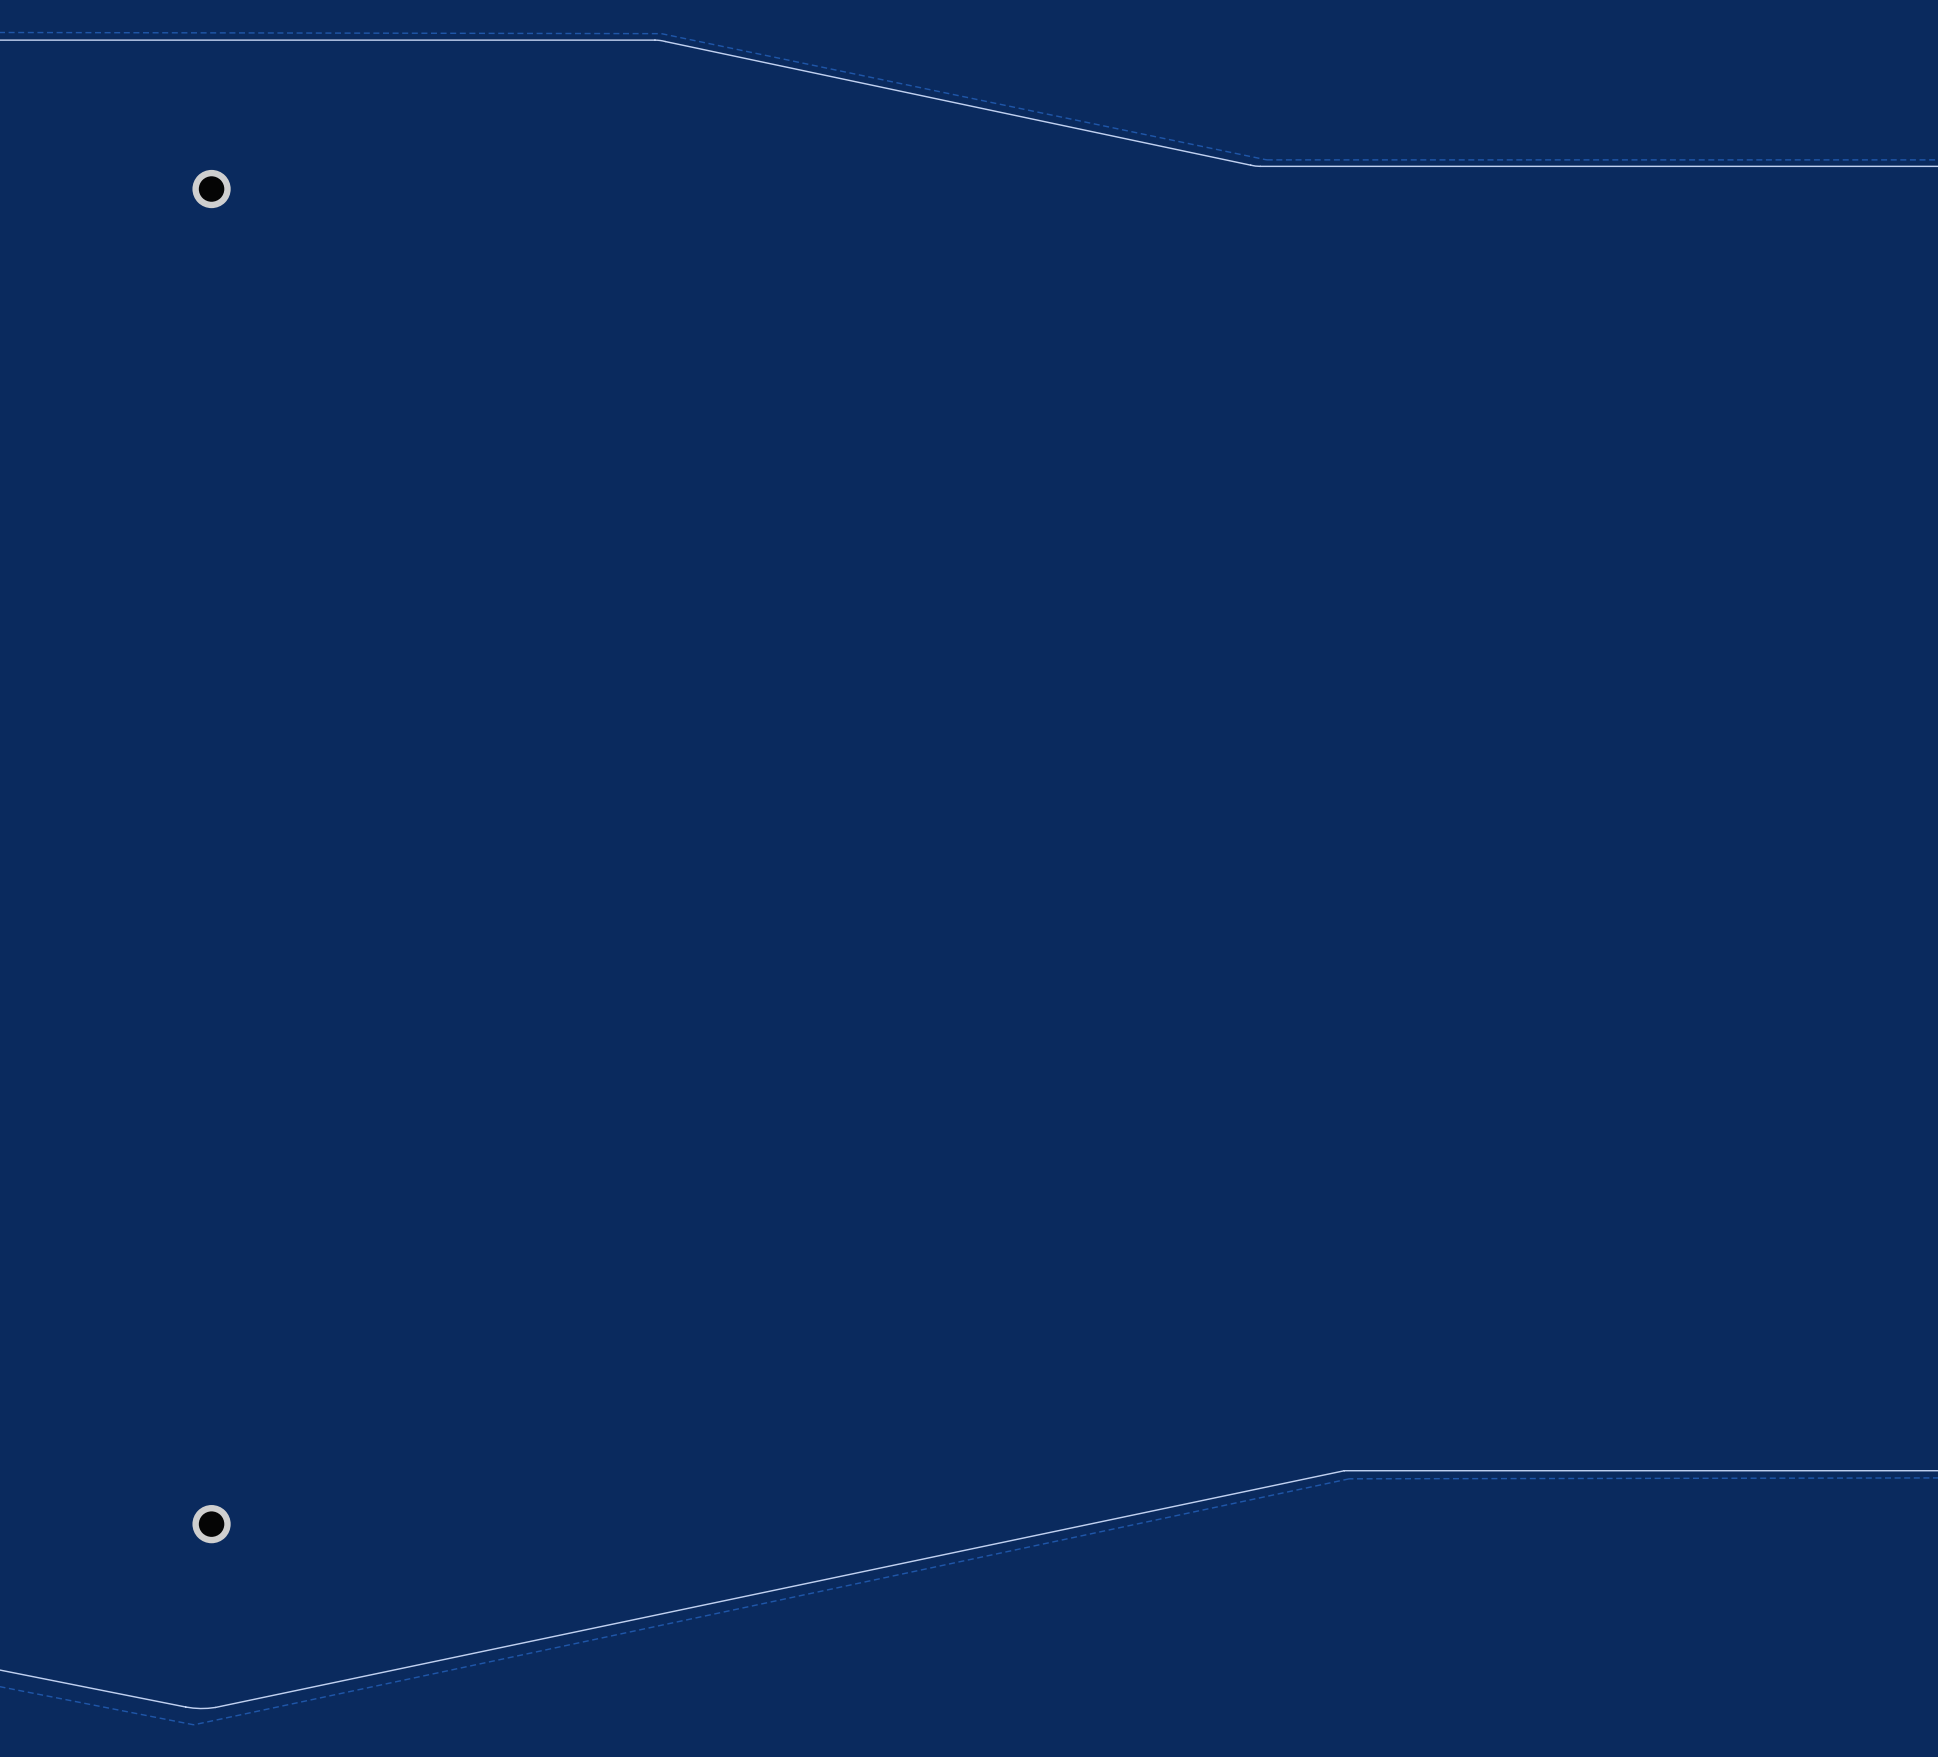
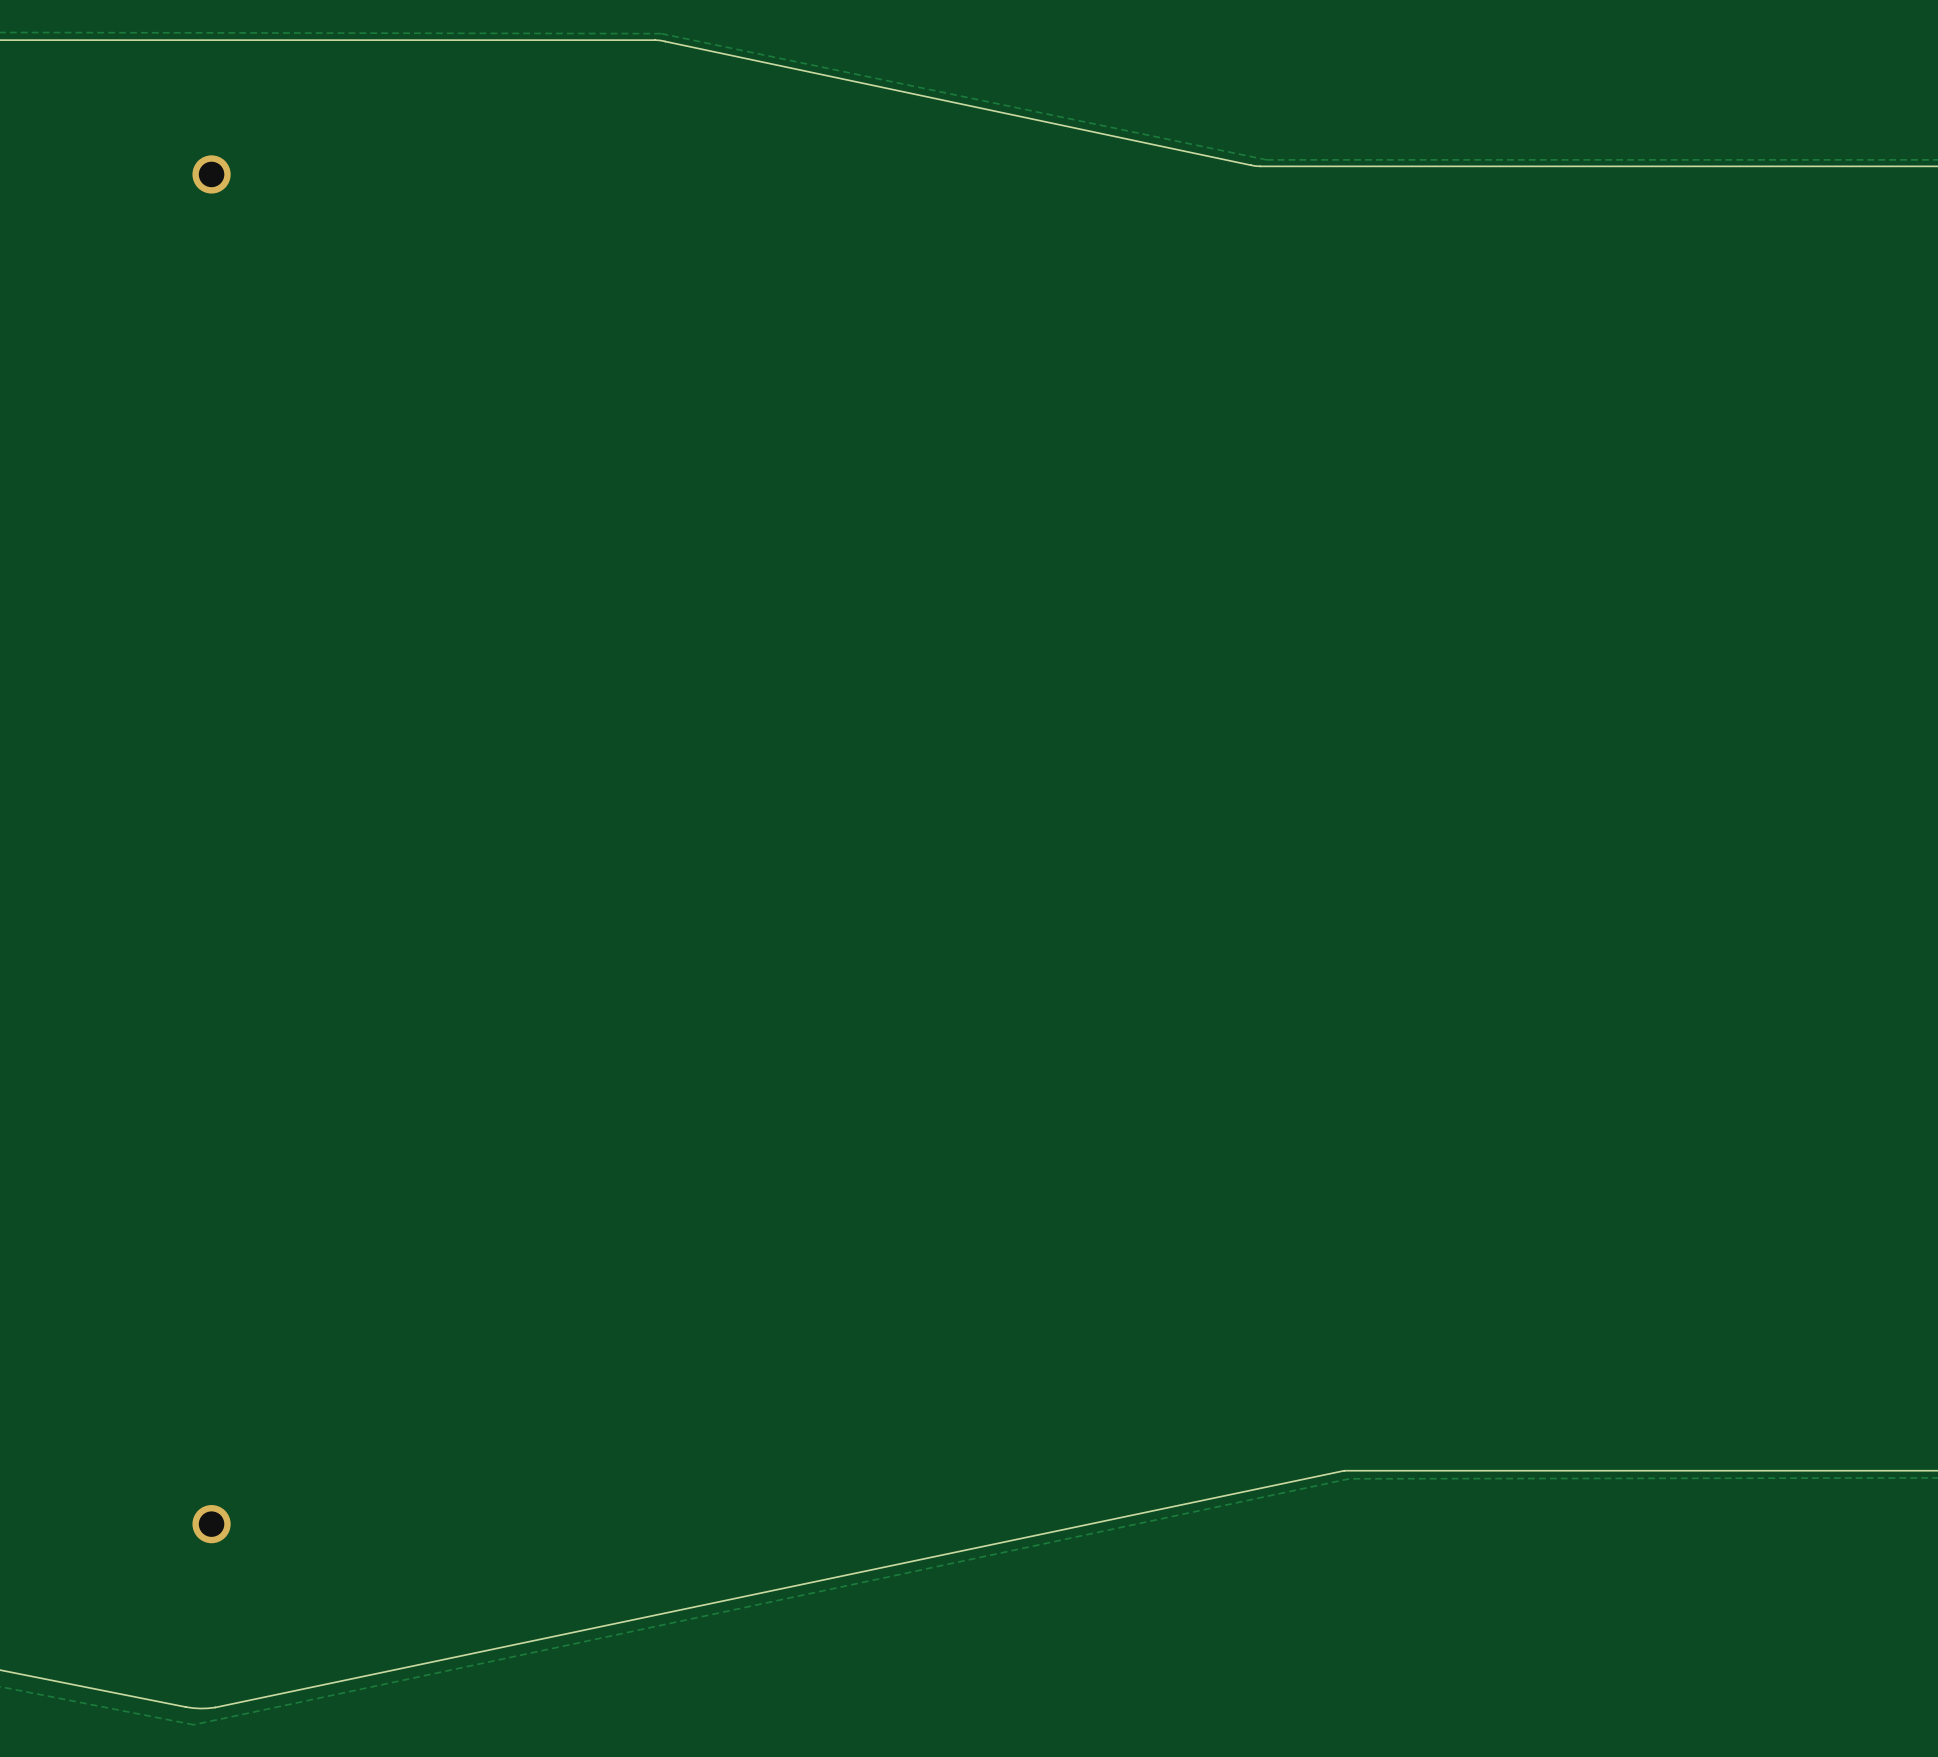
part position: (211, 189) -> (211, 174)

